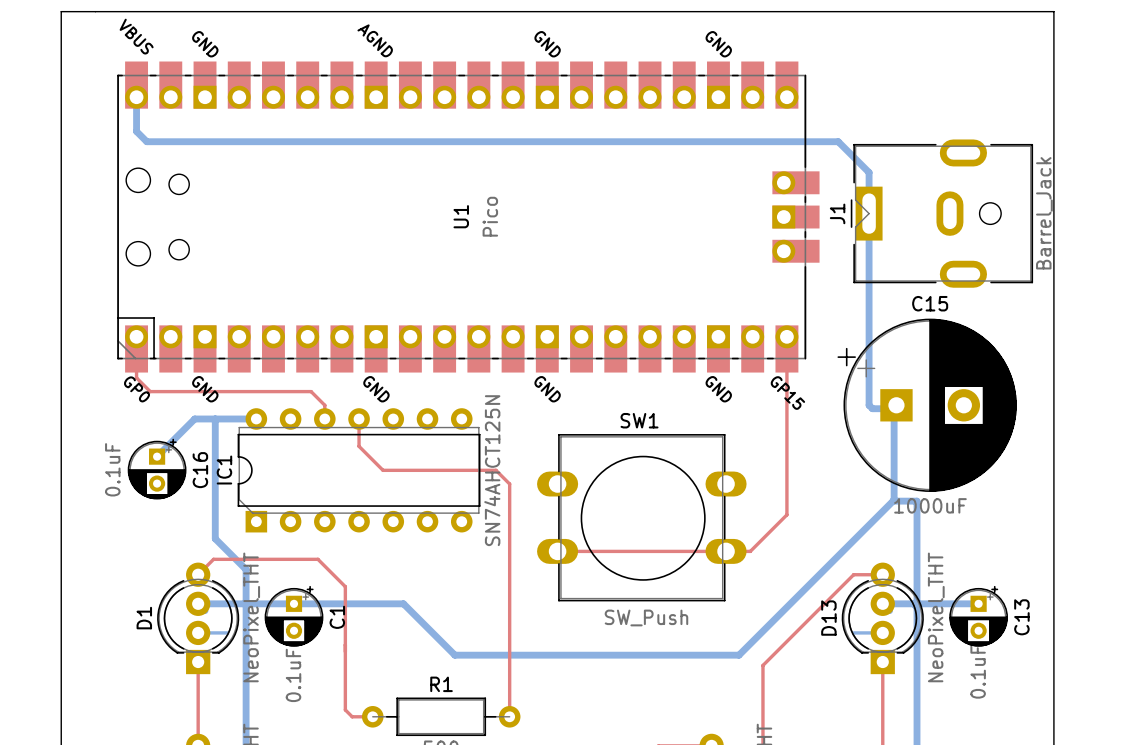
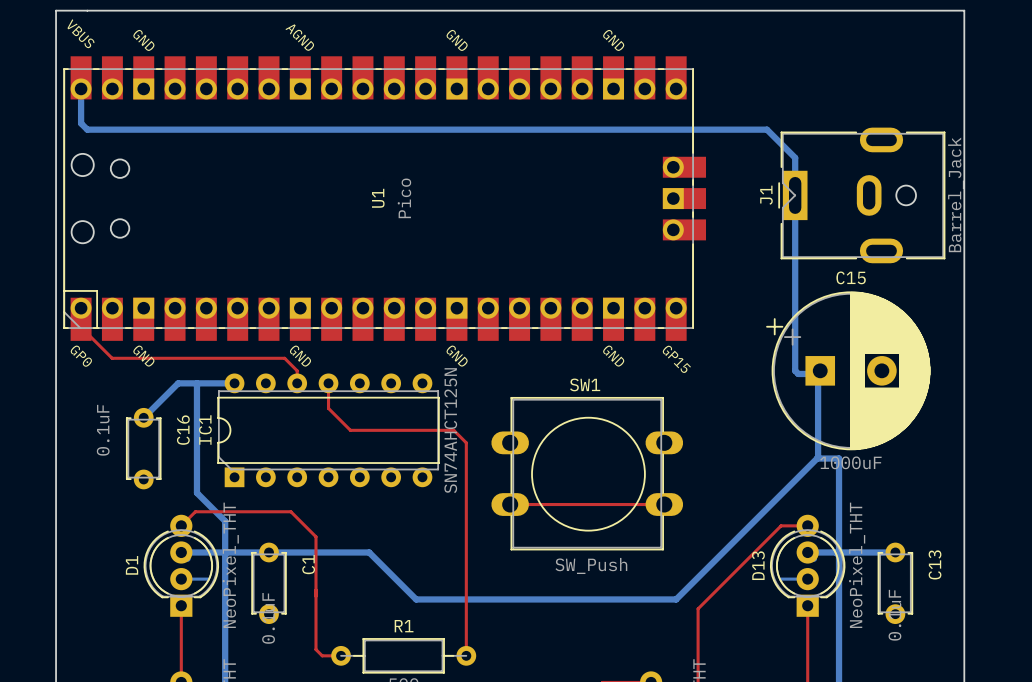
bottom track: (136, 97) (136, 131) (146, 141) -> (81, 88) (81, 123) (87, 129) (134, 129)
U1 position: (468, 217) -> (384, 198)
top track: (136, 336) (136, 377) (150, 391) -> (81, 308) (81, 327) (112, 358) (137, 358)
top track: (786, 336) (786, 514) (750, 551) (726, 551) -> none
C16 footprint: [127, 438, 187, 500] -> [126, 407, 162, 490]
C1 footprint: [264, 585, 324, 647] -> [251, 542, 287, 625]
C13 footprint: [949, 585, 1009, 647] -> [877, 542, 914, 625]

